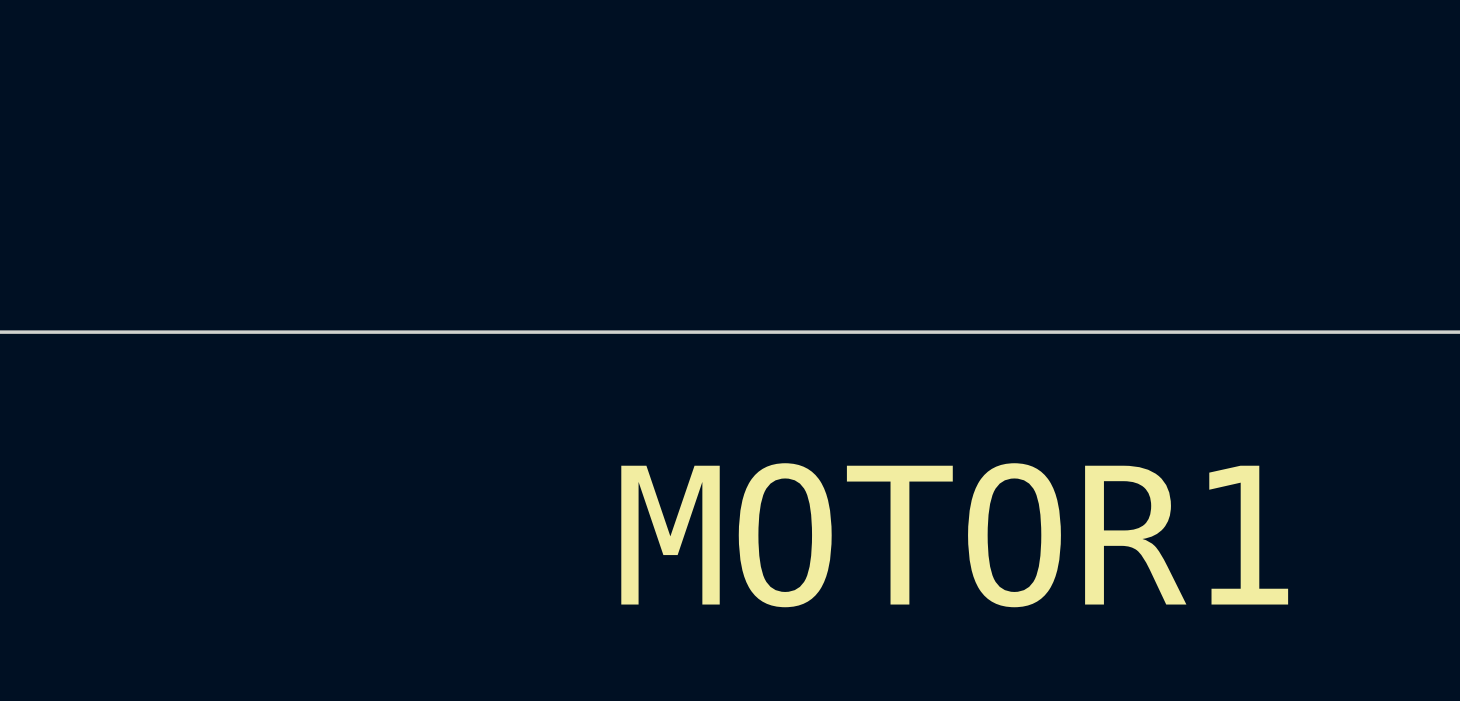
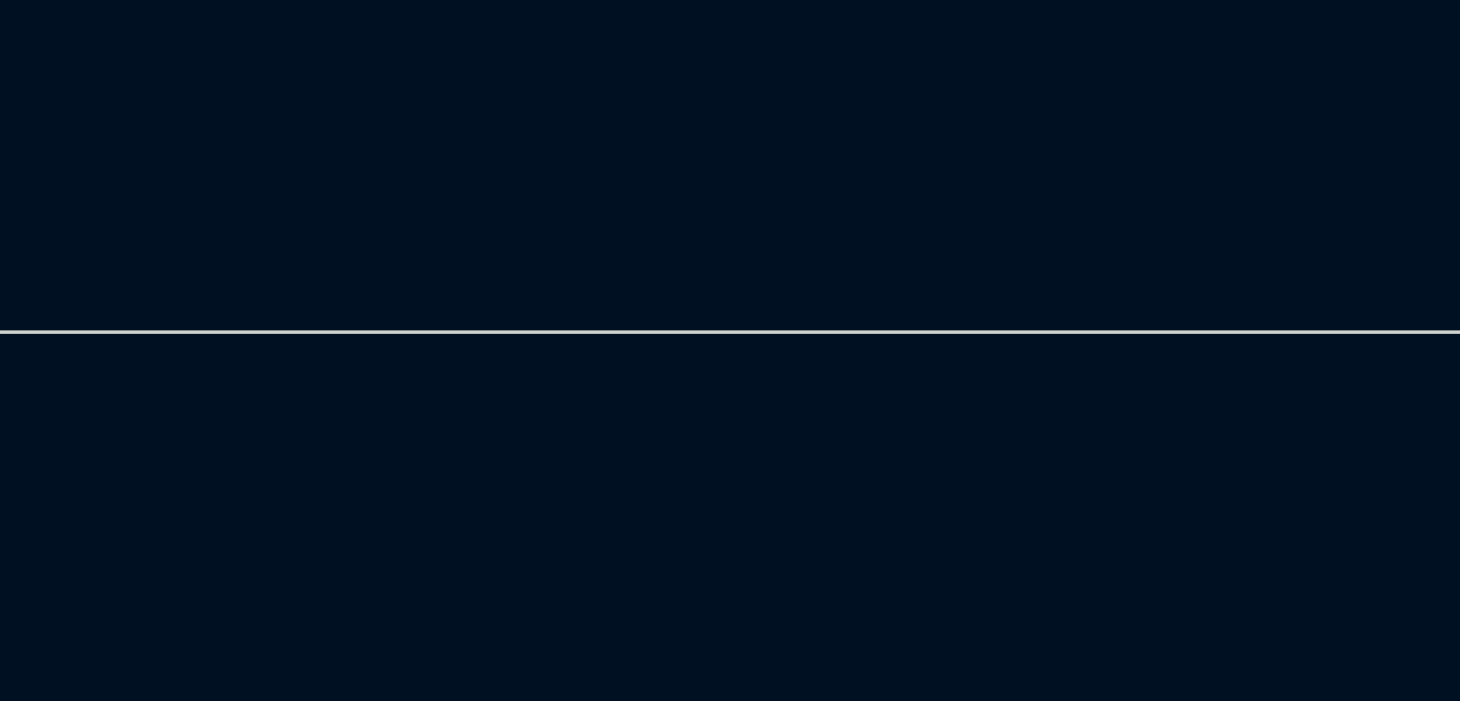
text: MOTOR1 (954, 535) -> none

